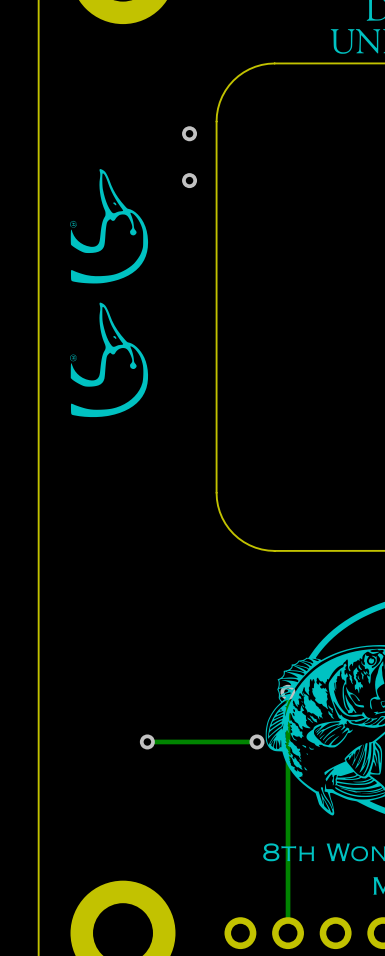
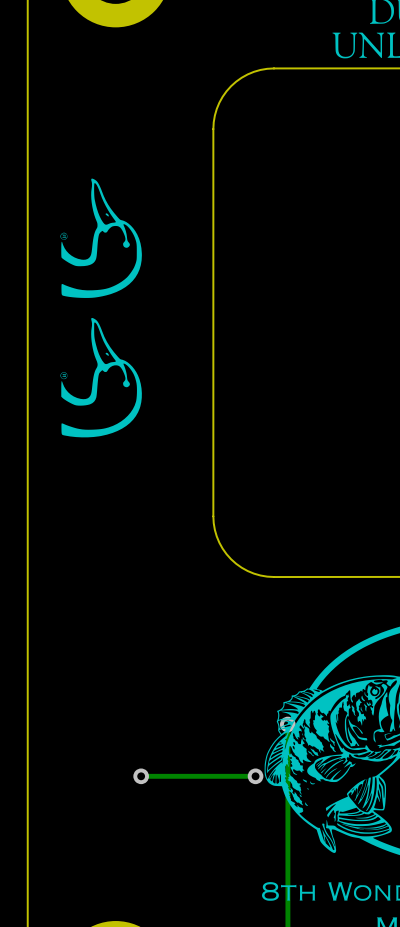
via: (189, 133) -> none
via: (189, 180) -> none

